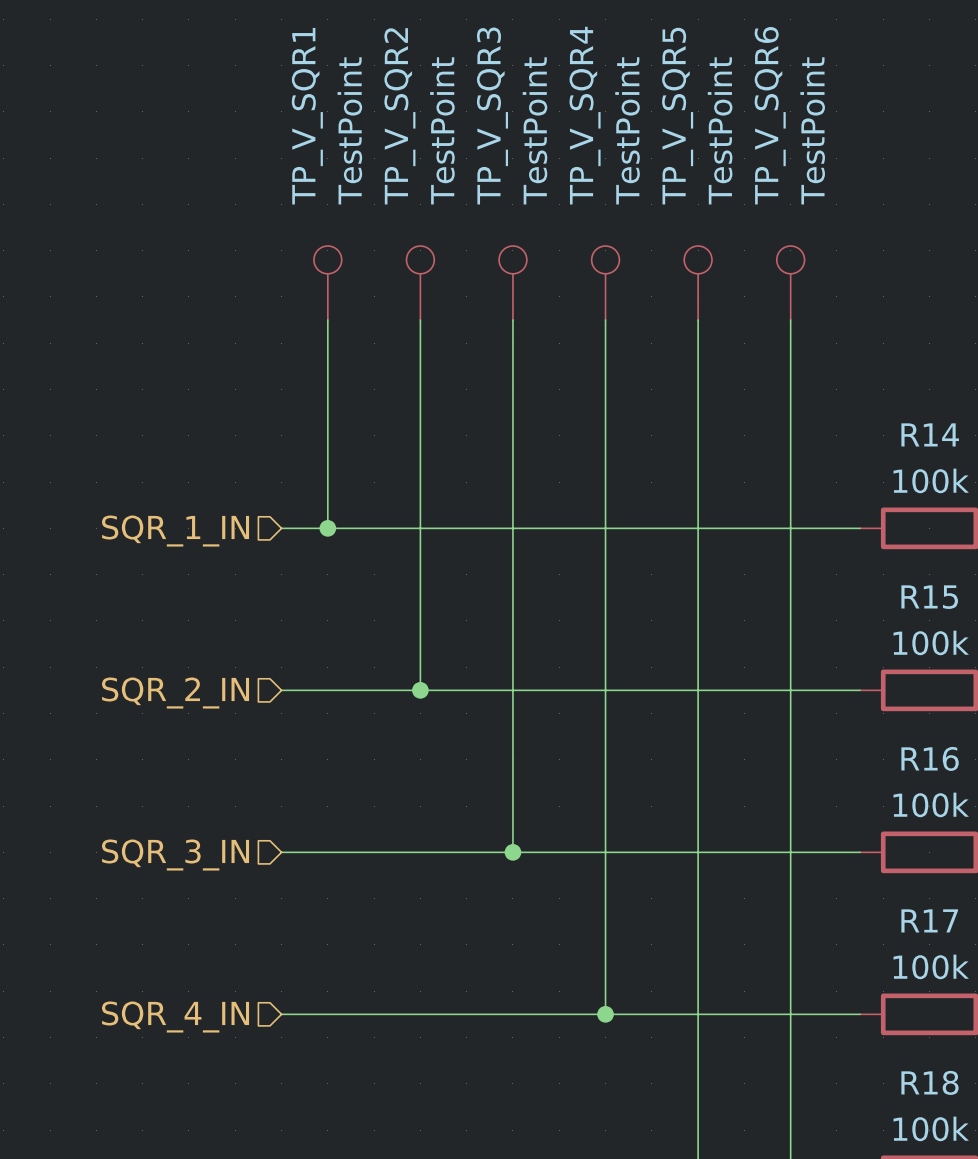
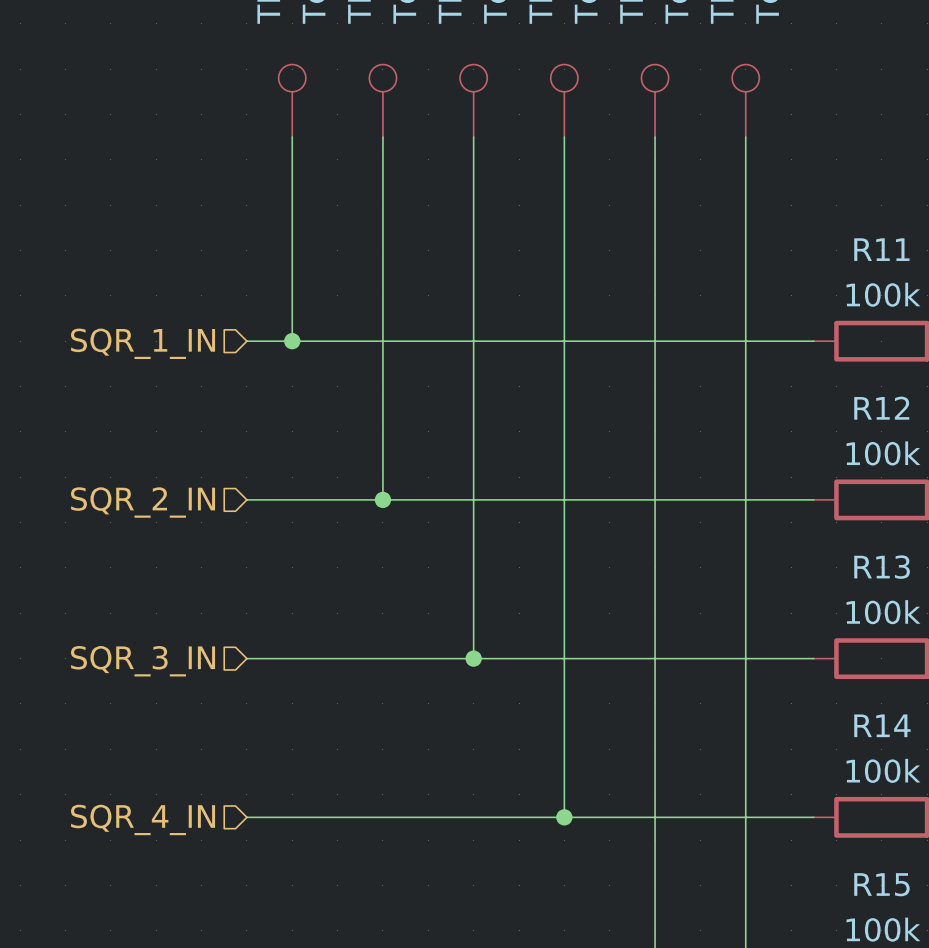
R14 name: R14 (930, 434) -> R11 (881, 249)
R15 name: R15 (929, 597) -> R12 (881, 408)
R16 name: R16 (930, 758) -> R13 (882, 567)
R17 name: R17 (929, 920) -> R14 (882, 725)
R18 name: R18 (929, 1082) -> R15 (881, 884)

